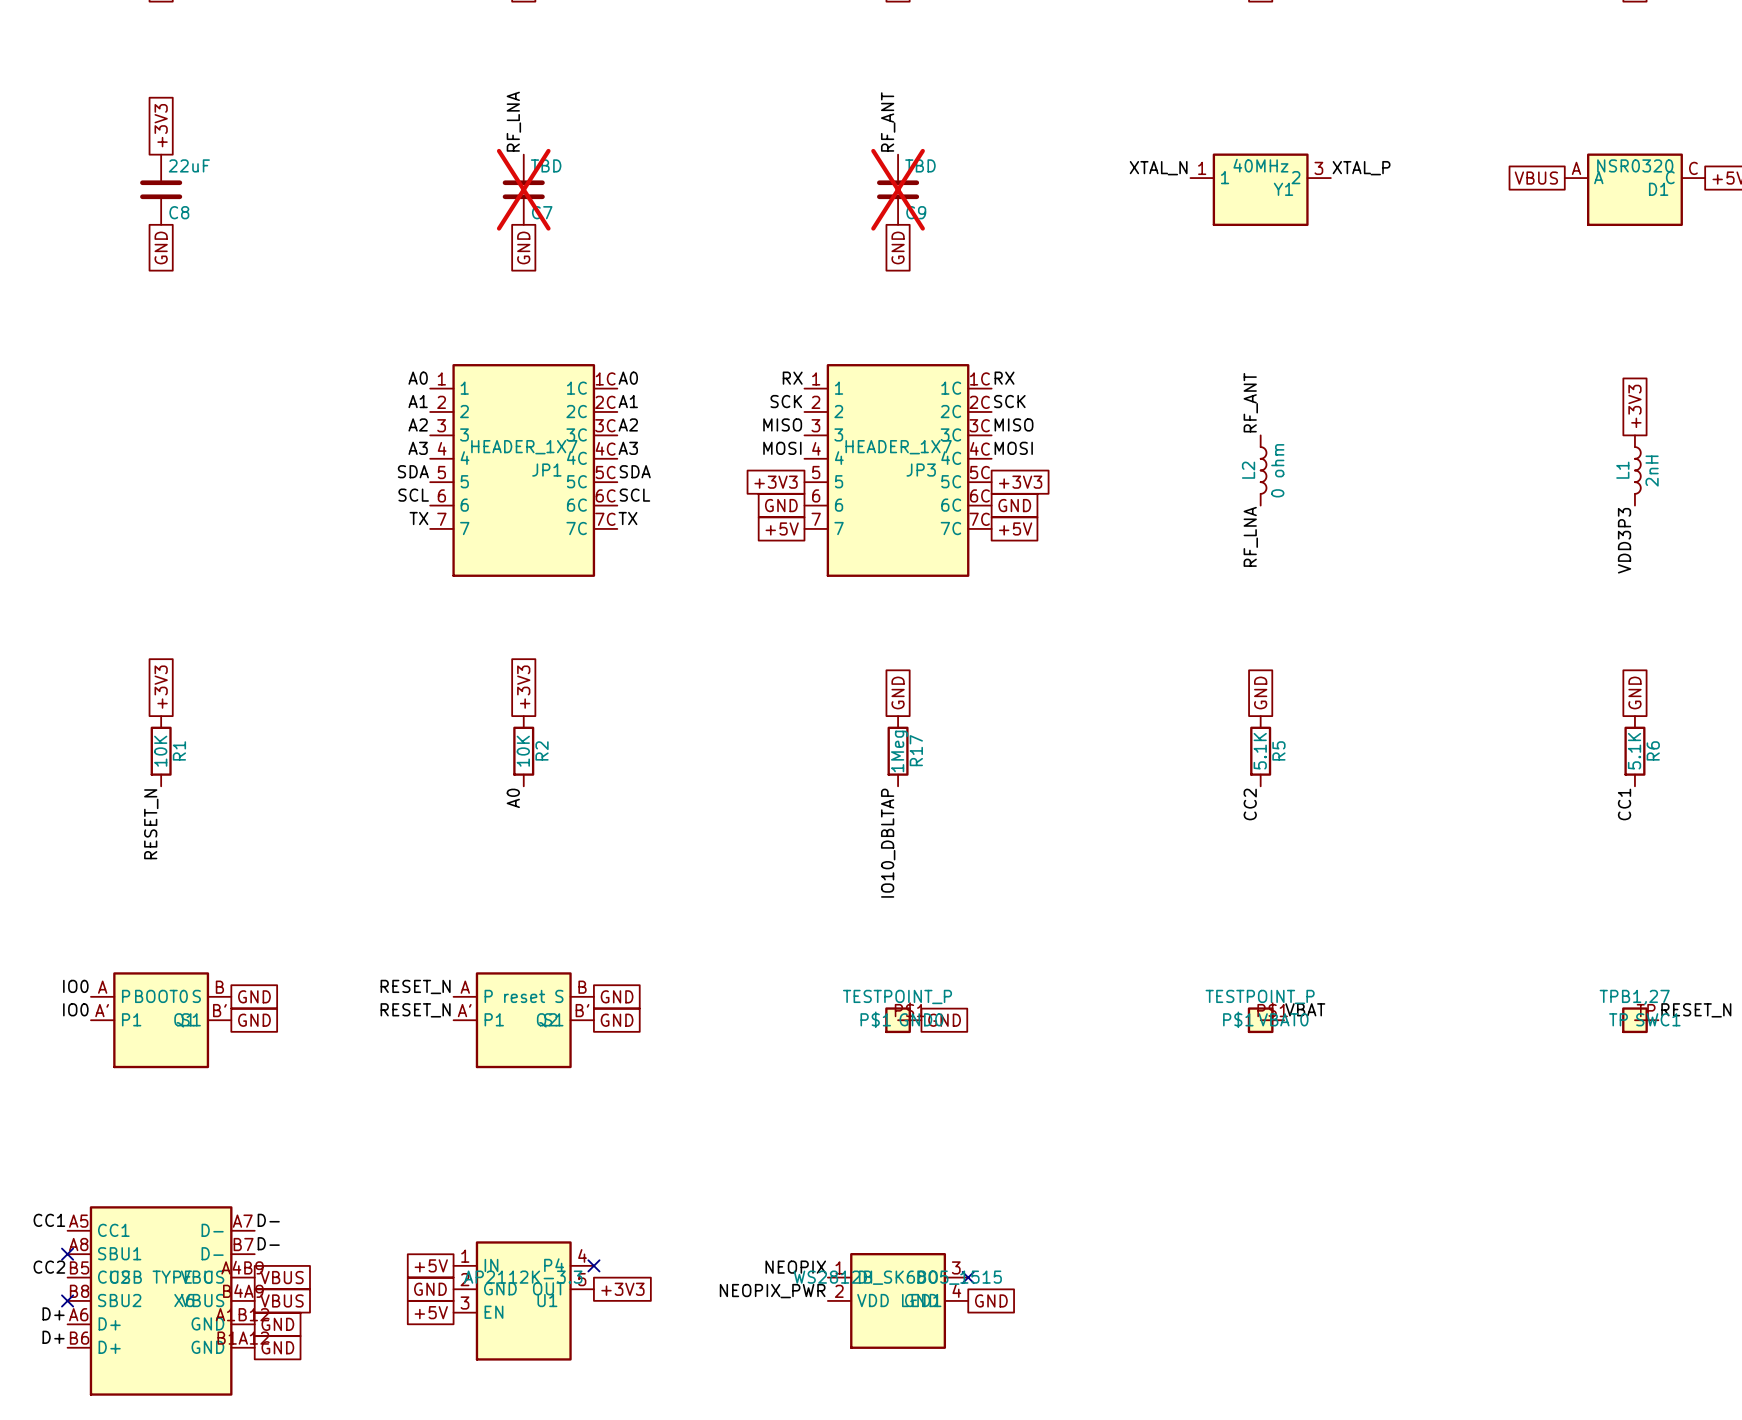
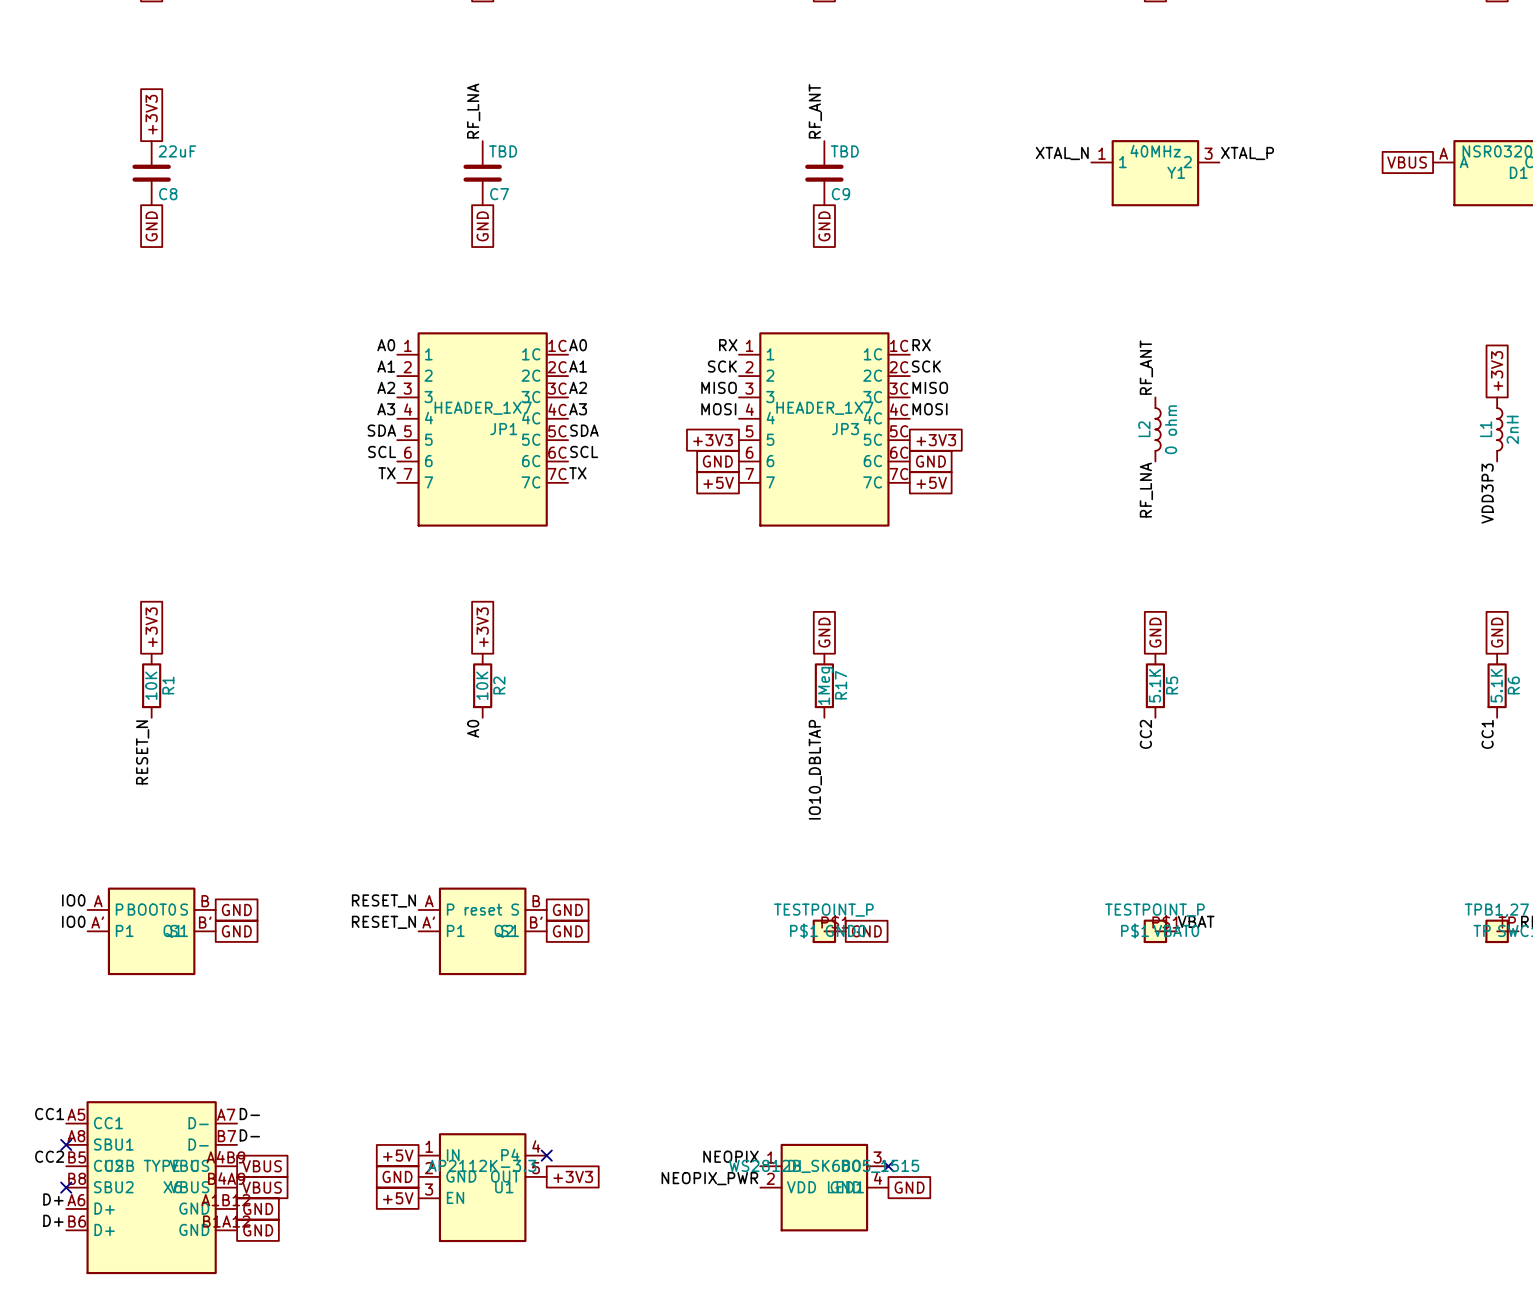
C7 do-not-place cross: (523, 189) -> none
C9 do-not-place cross: (898, 189) -> none

